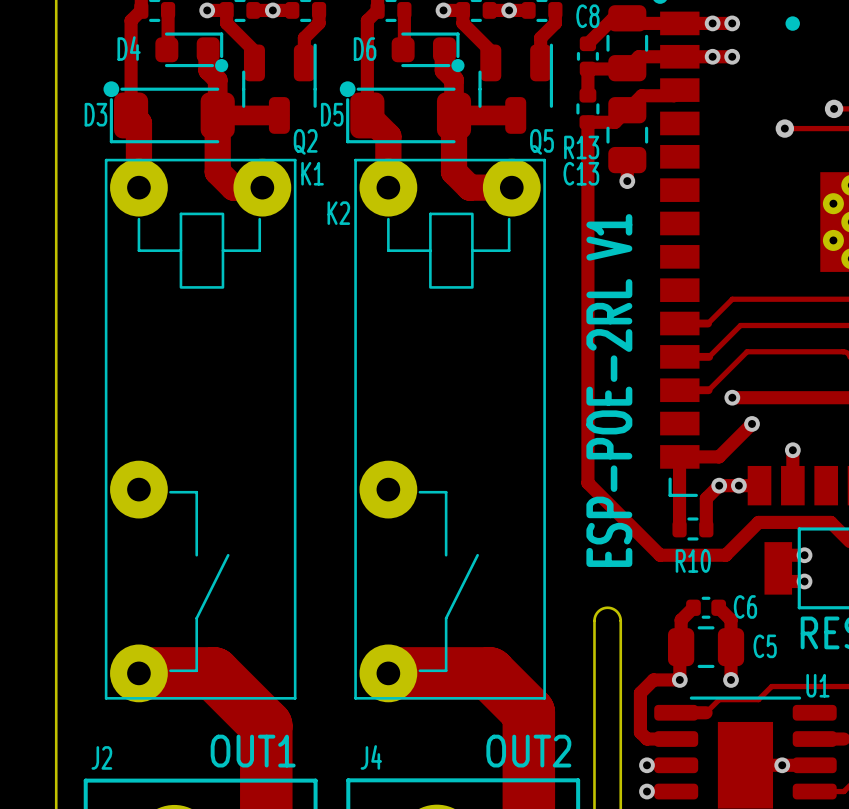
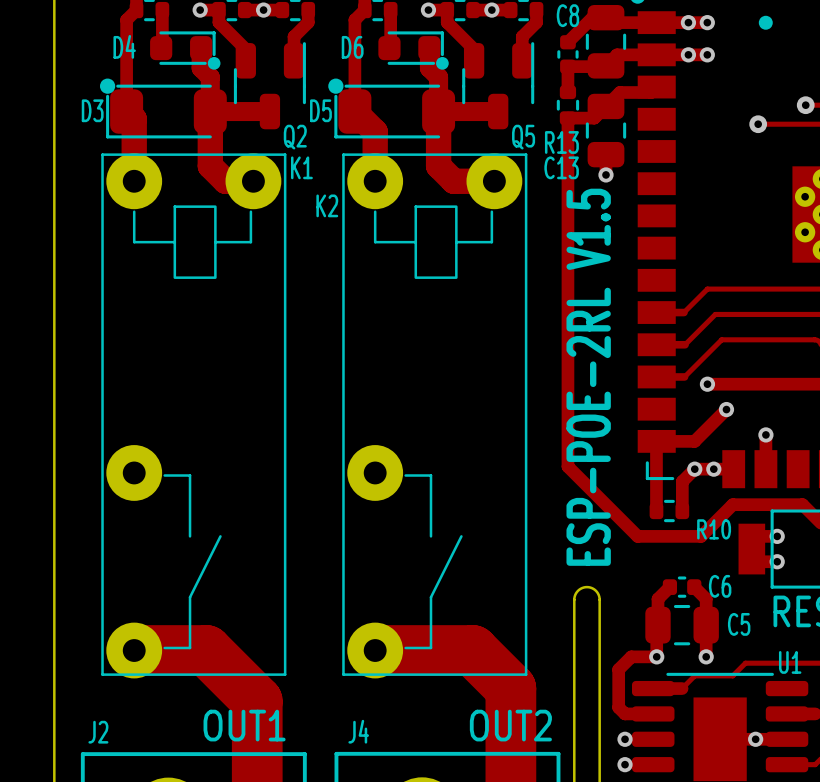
text: ESP-POE-2RL V1 (609, 390) -> ESP-POE-2RL V1.5 (588, 377)
R10 name position: R10 (693, 561) -> R10 (714, 529)

